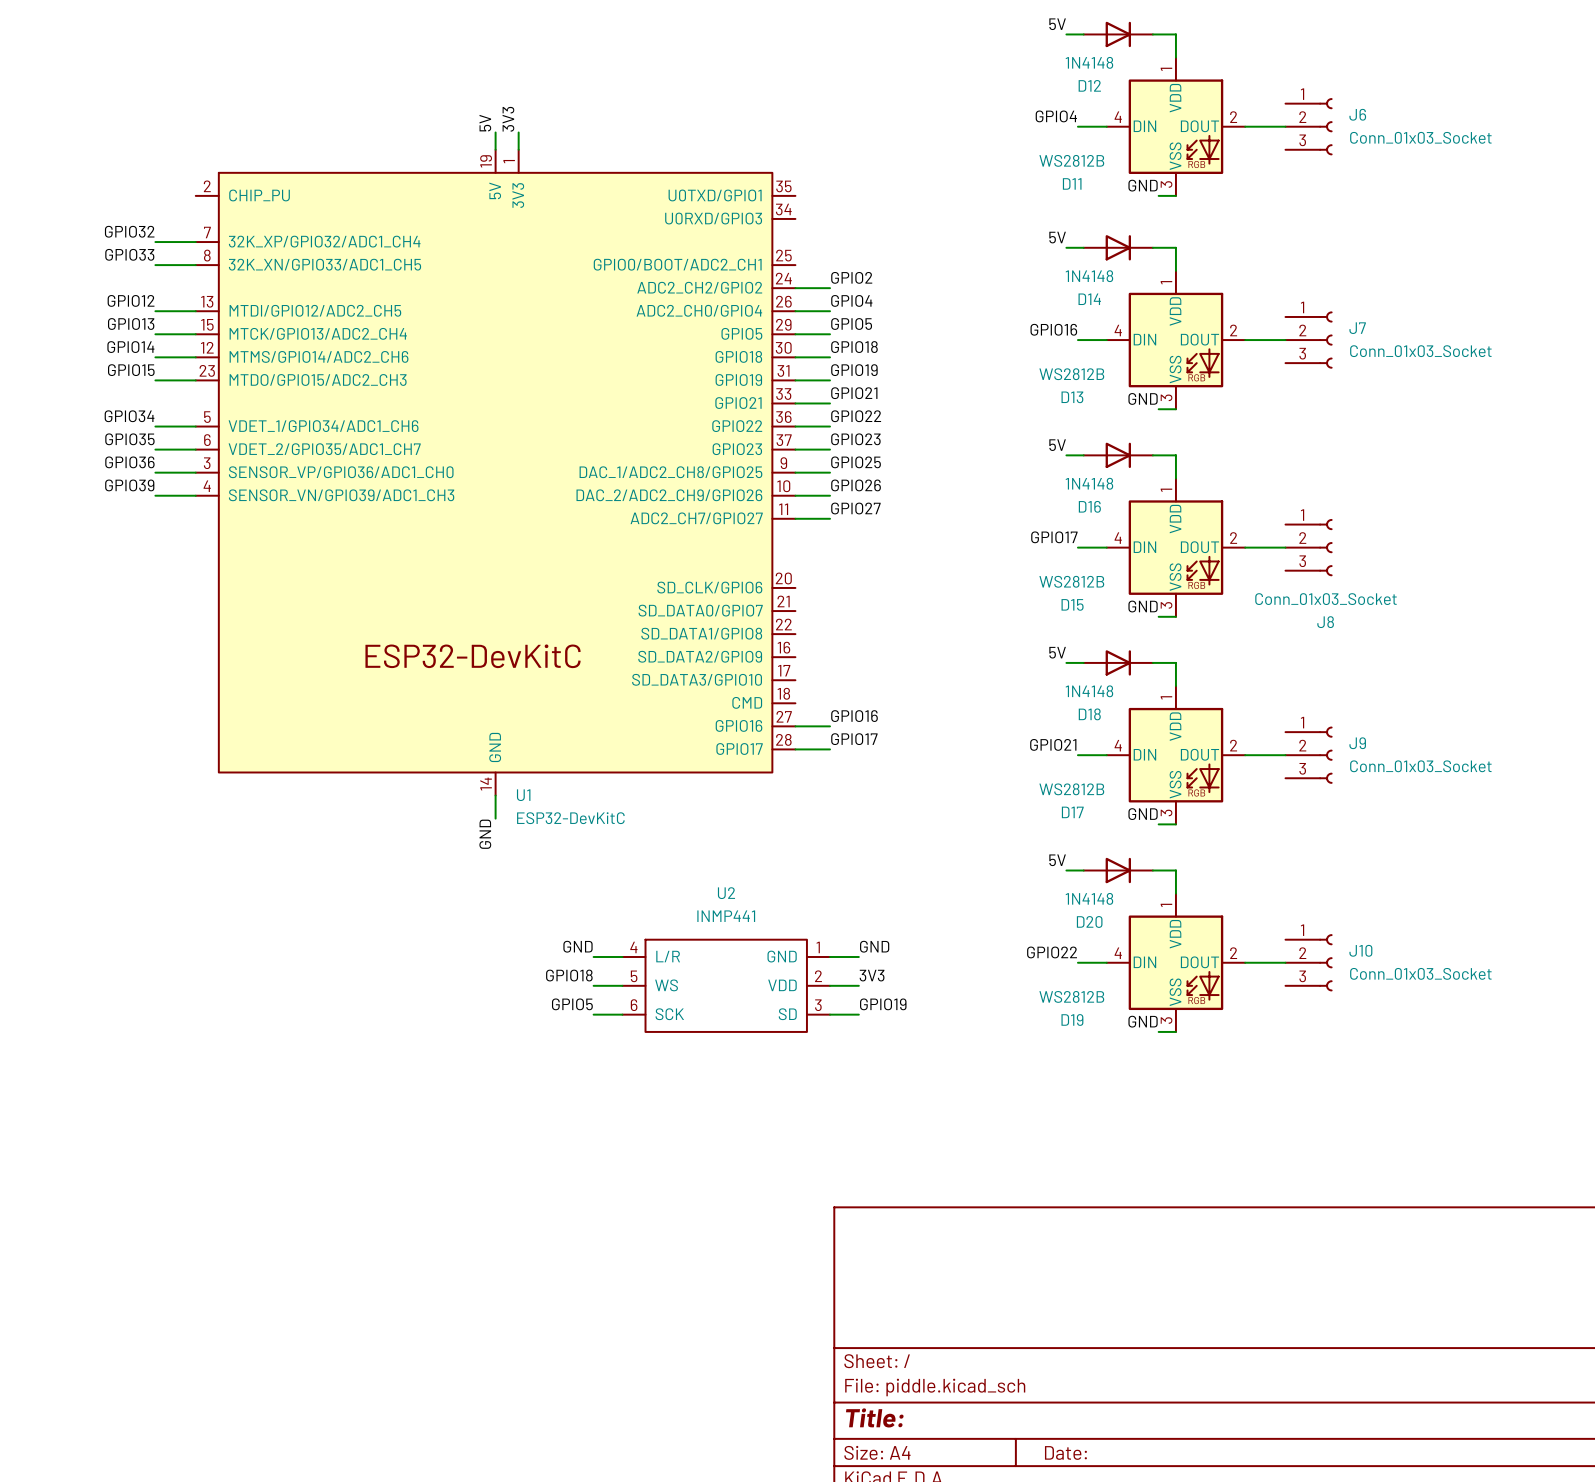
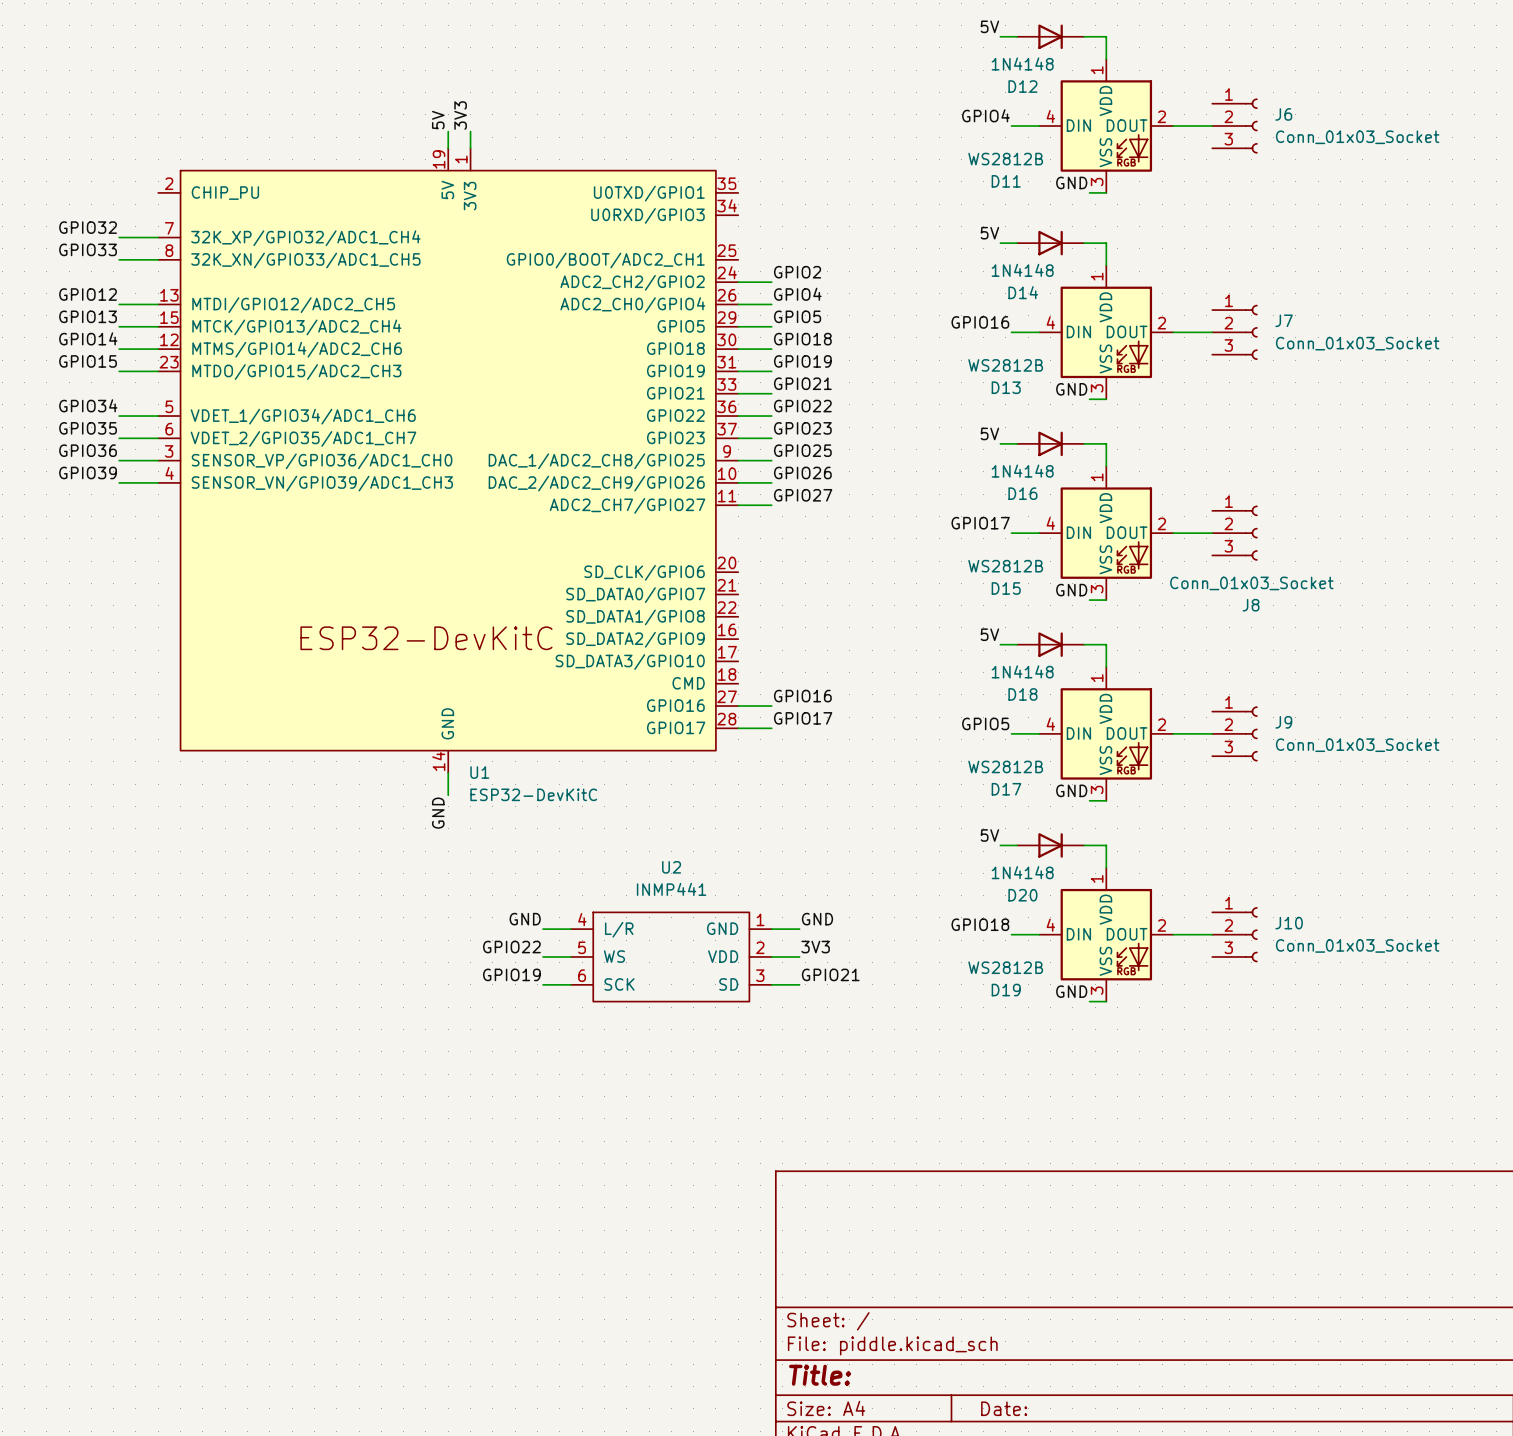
label: GPIO21 (1053, 744) -> GPIO5 (985, 723)
label: GPIO22 (1052, 952) -> GPIO18 (980, 924)
label: GPIO18 (569, 975) -> GPIO22 (511, 947)
label: GPIO5 (572, 1004) -> GPIO19 (511, 974)
label: GPIO19 (883, 1004) -> GPIO21 (830, 974)

